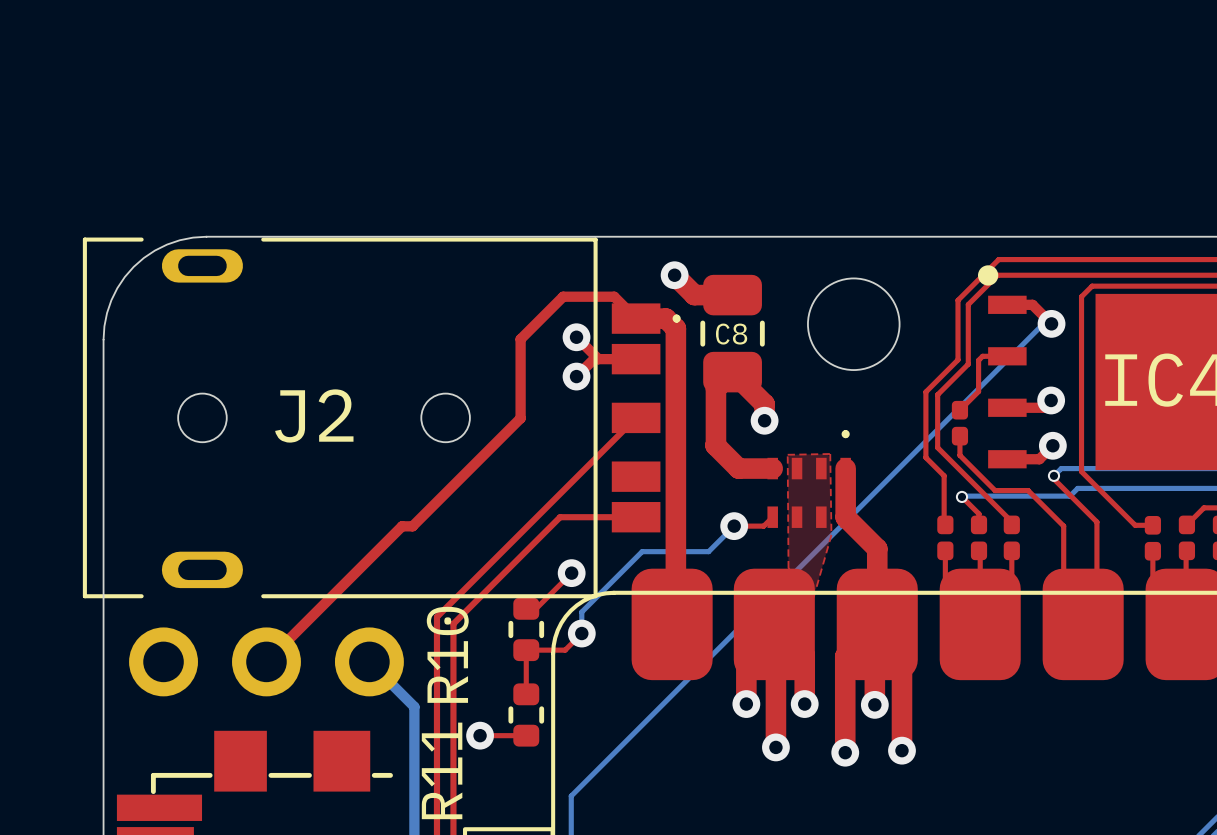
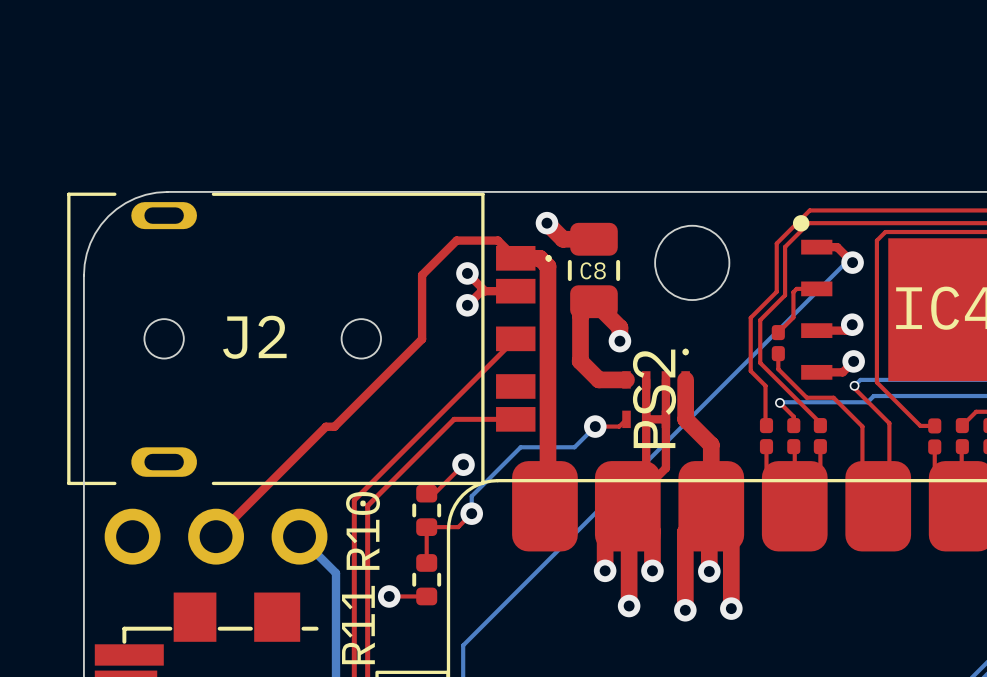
top zone outline: (830, 453) (787, 454) (788, 568) (813, 597) (831, 535) (830, 453) -> none
top track: none -> (646, 379) (646, 487) (665, 468) (665, 379)
PS2 name: none -> PS2 (654, 398)
top track: none -> (646, 419) (665, 419)

